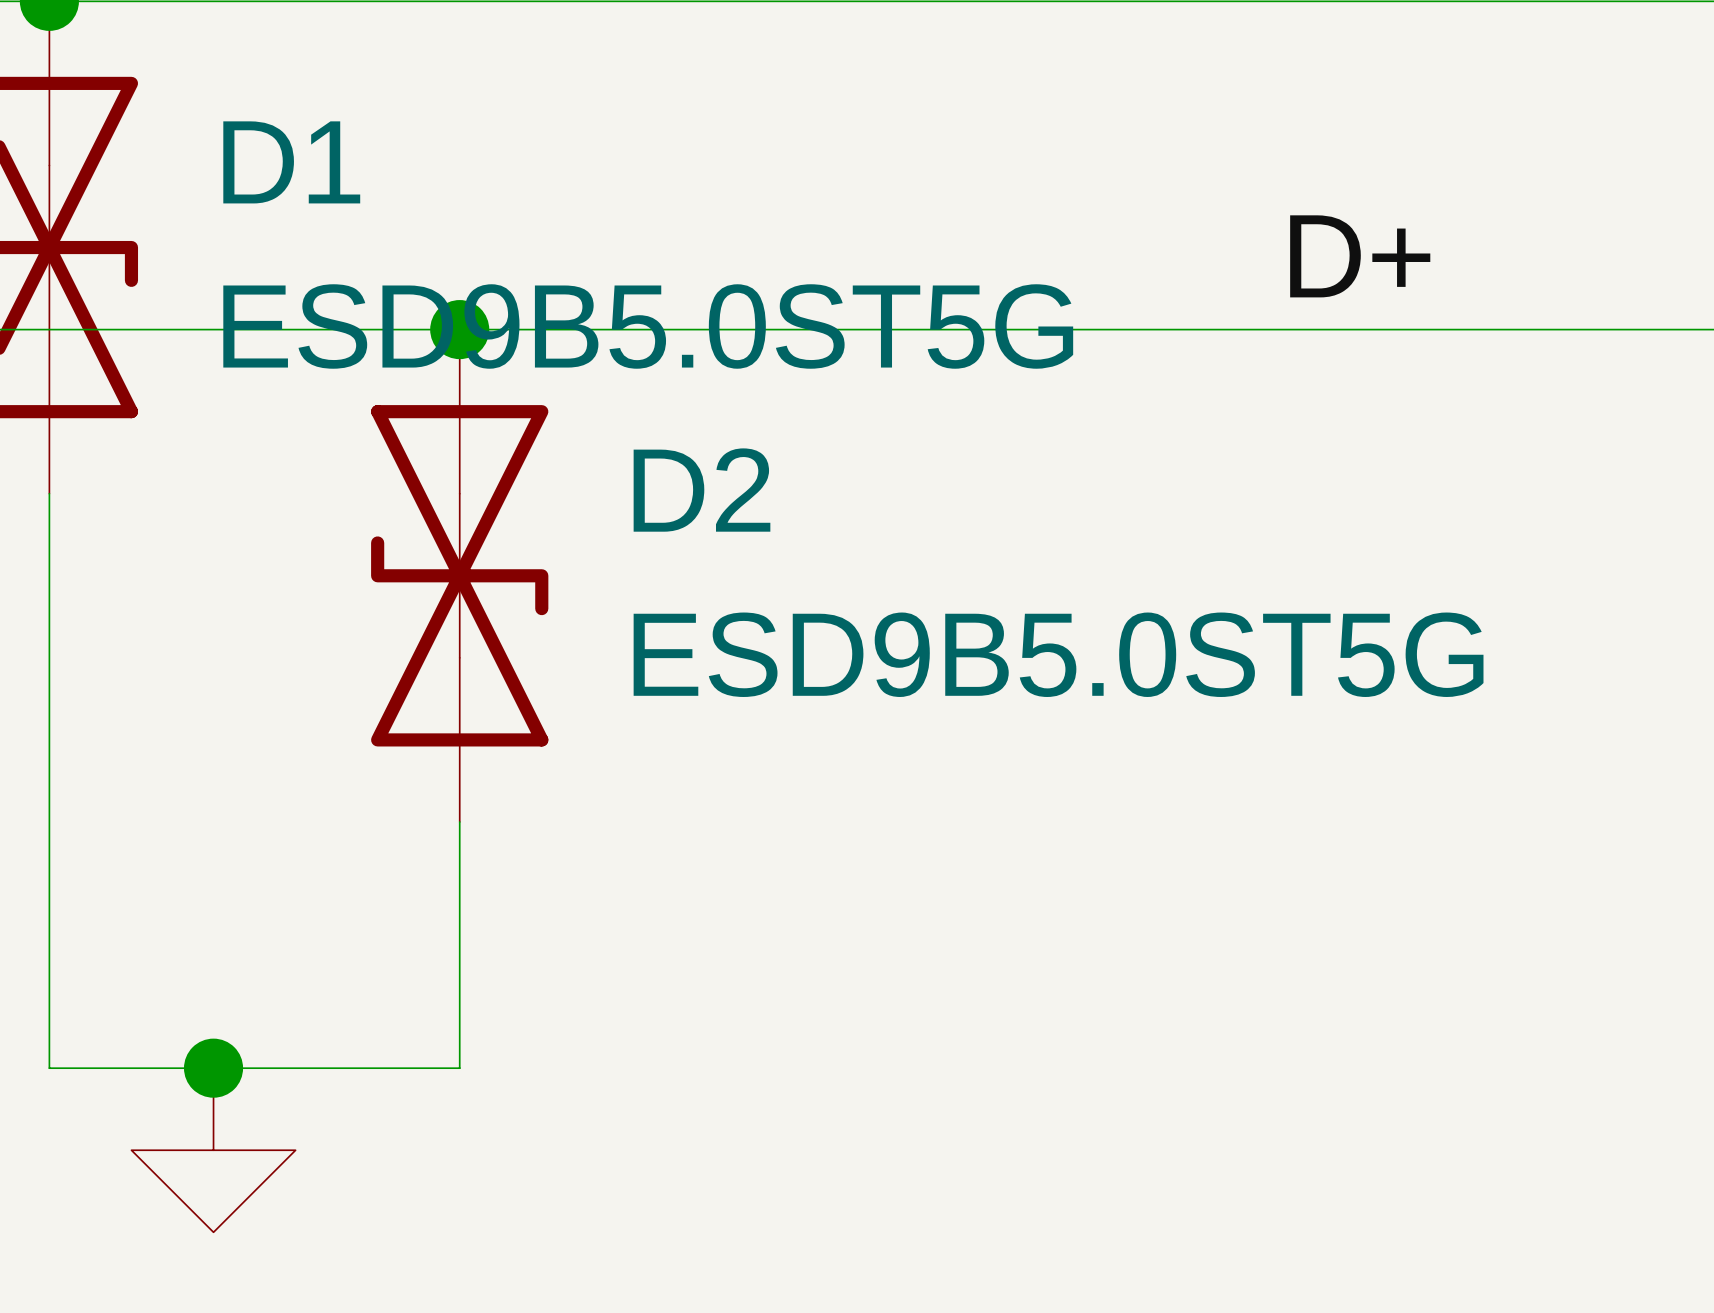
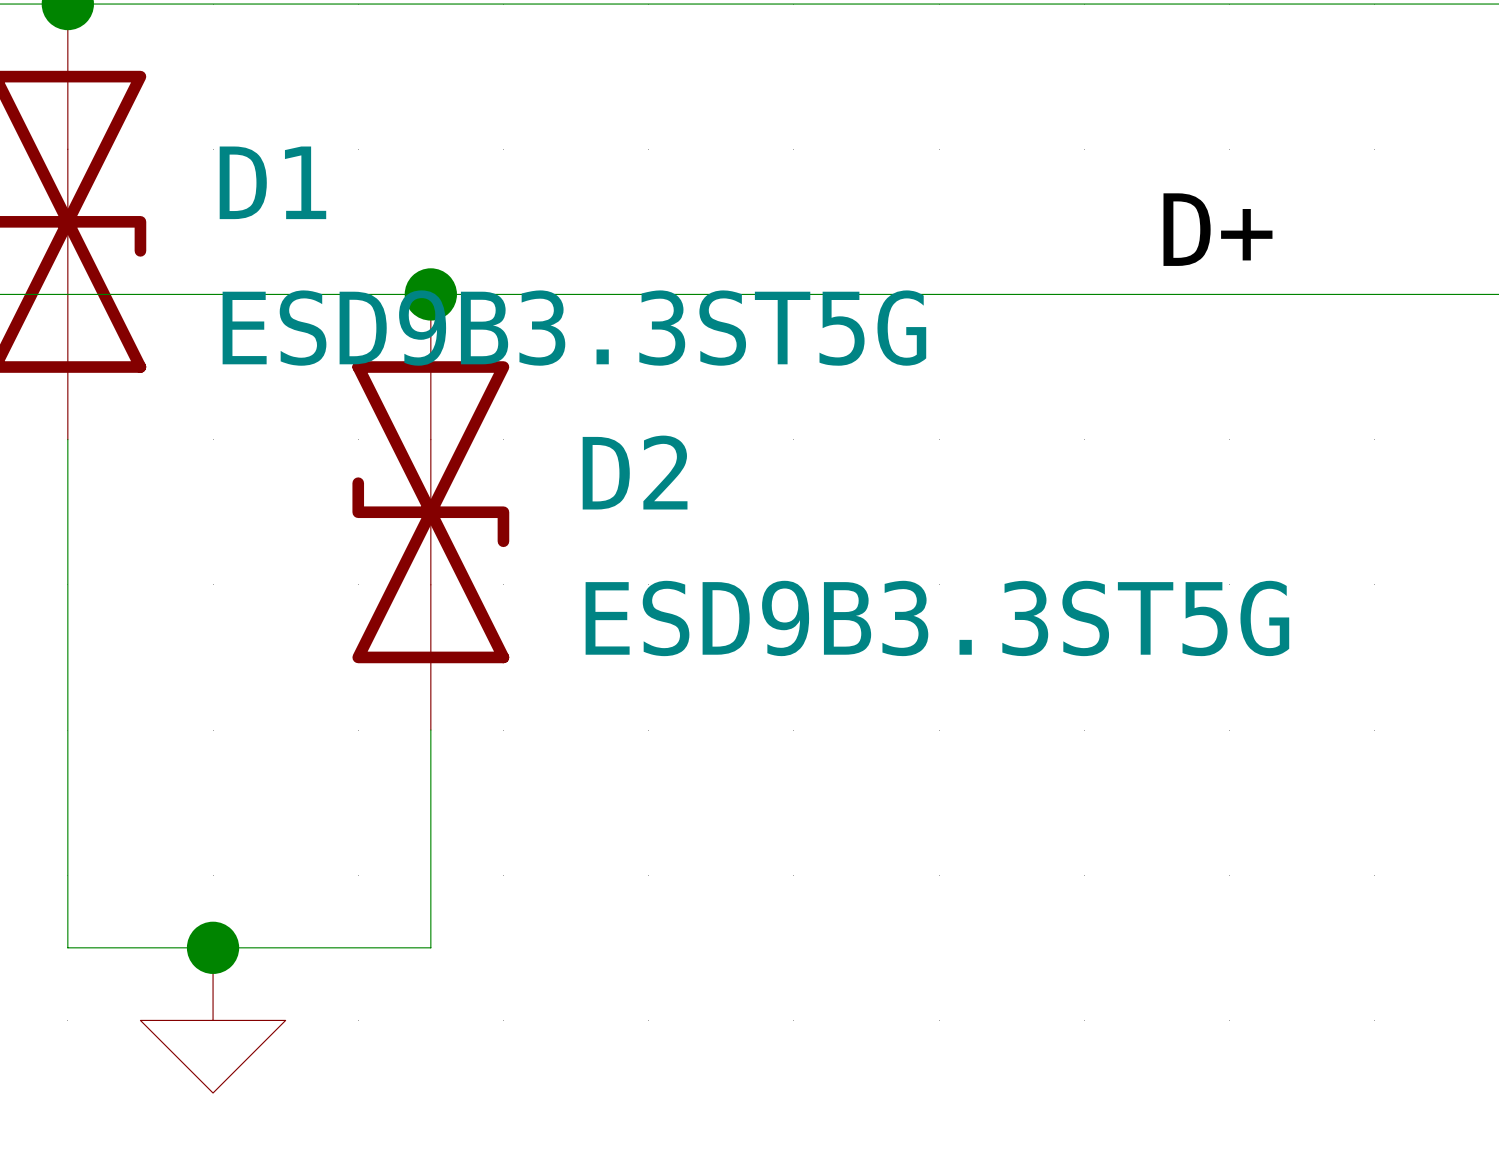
D1 name position: D1 (291, 162) -> D1 (272, 182)
D1 value: ESD9B5.0ST5G (648, 326) -> ESD9B3.3ST5G (574, 328)
D2 name position: D2 (701, 490) -> D2 (635, 472)
D2 value: ESD9B5.0ST5G (1058, 654) -> ESD9B3.3ST5G (937, 618)

